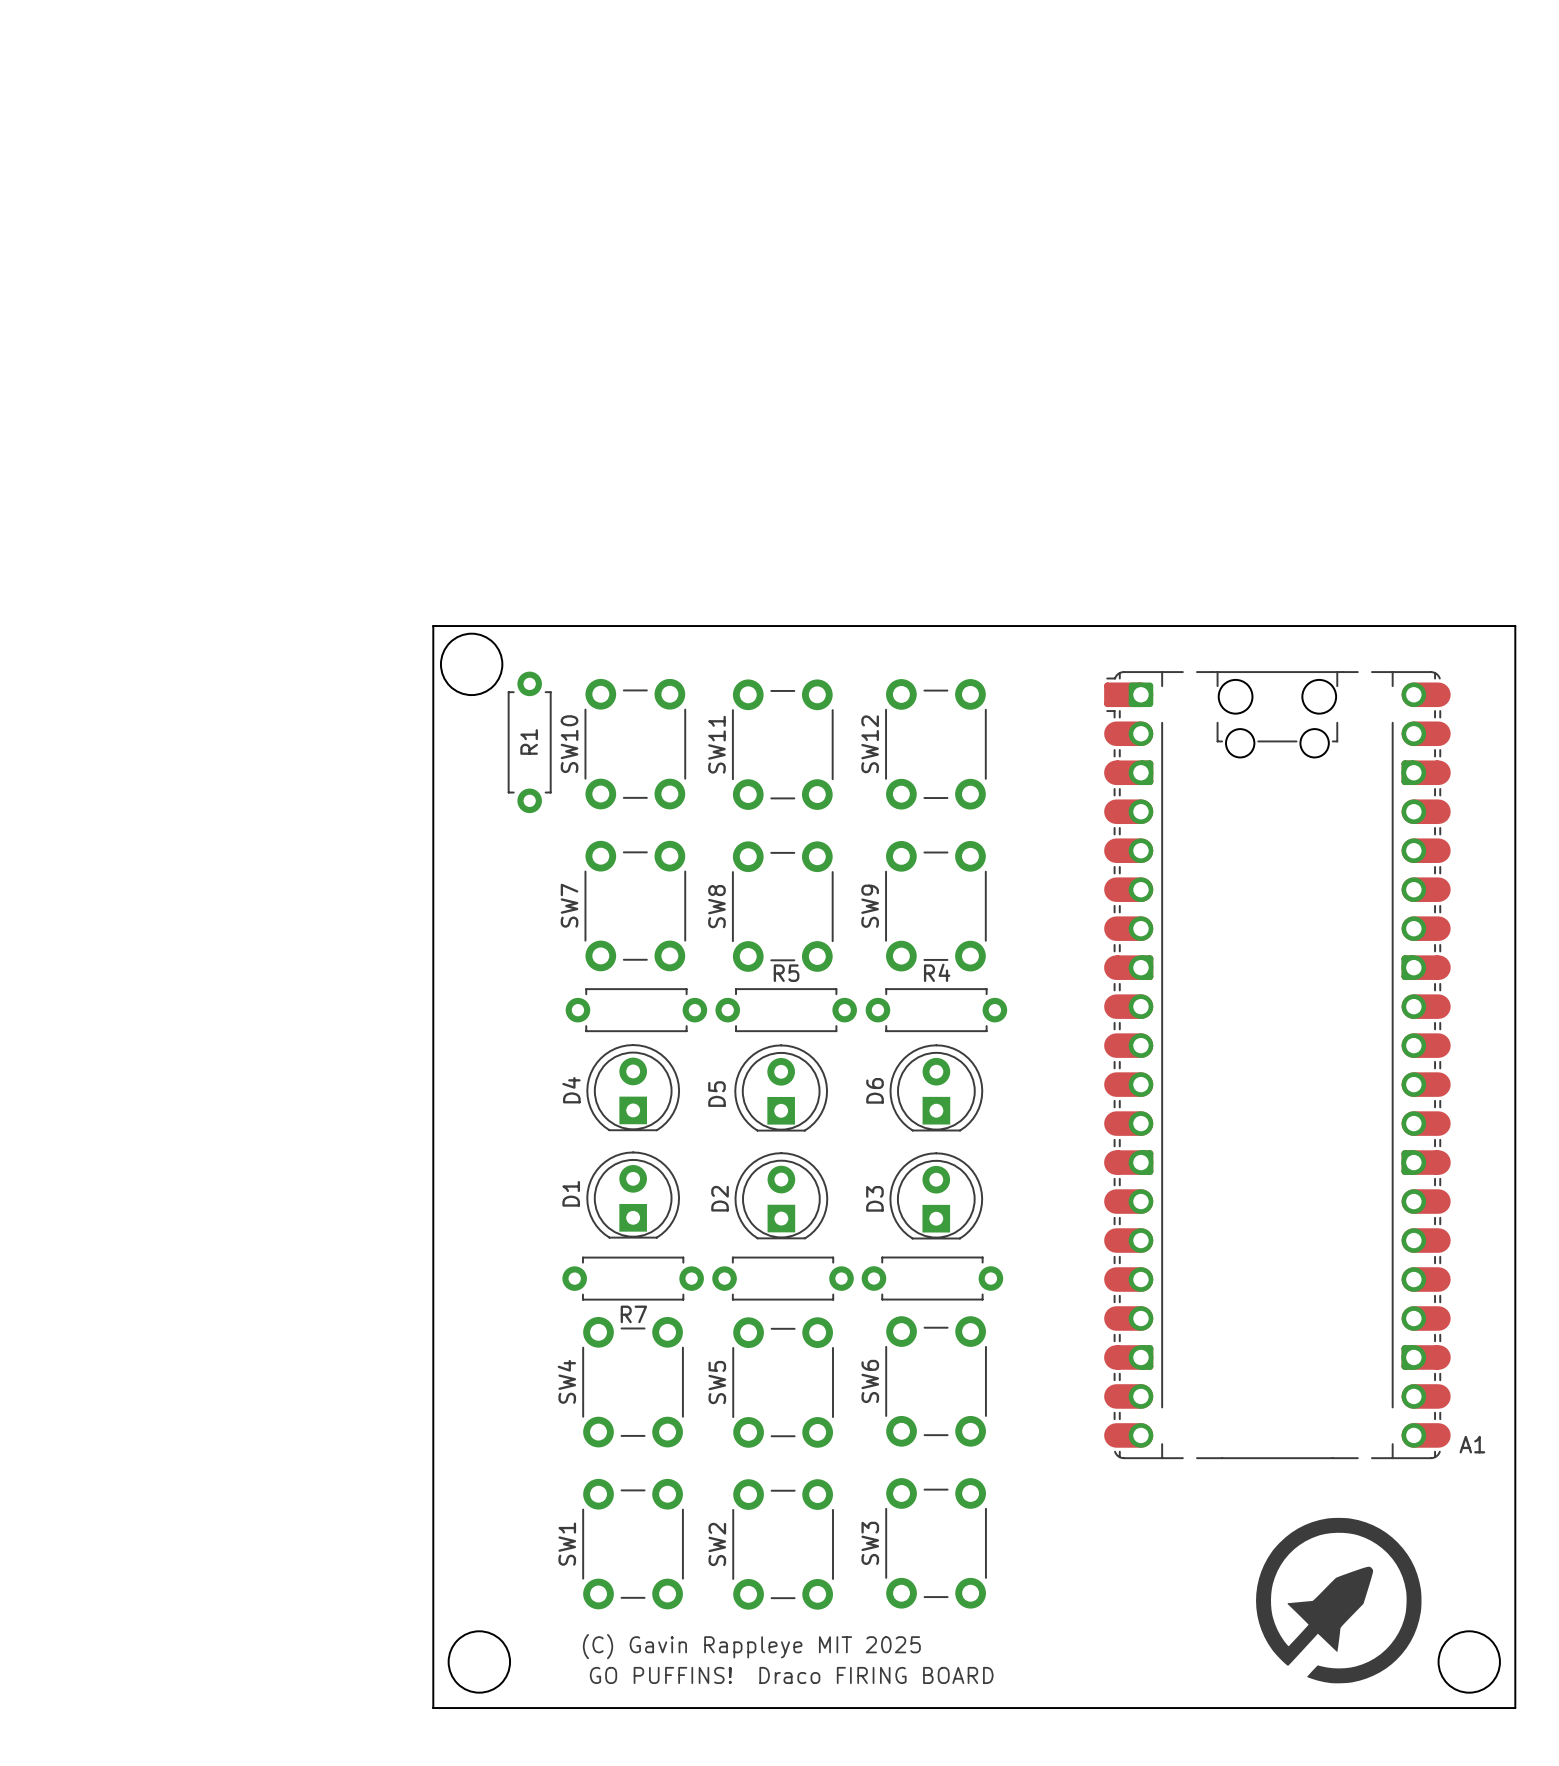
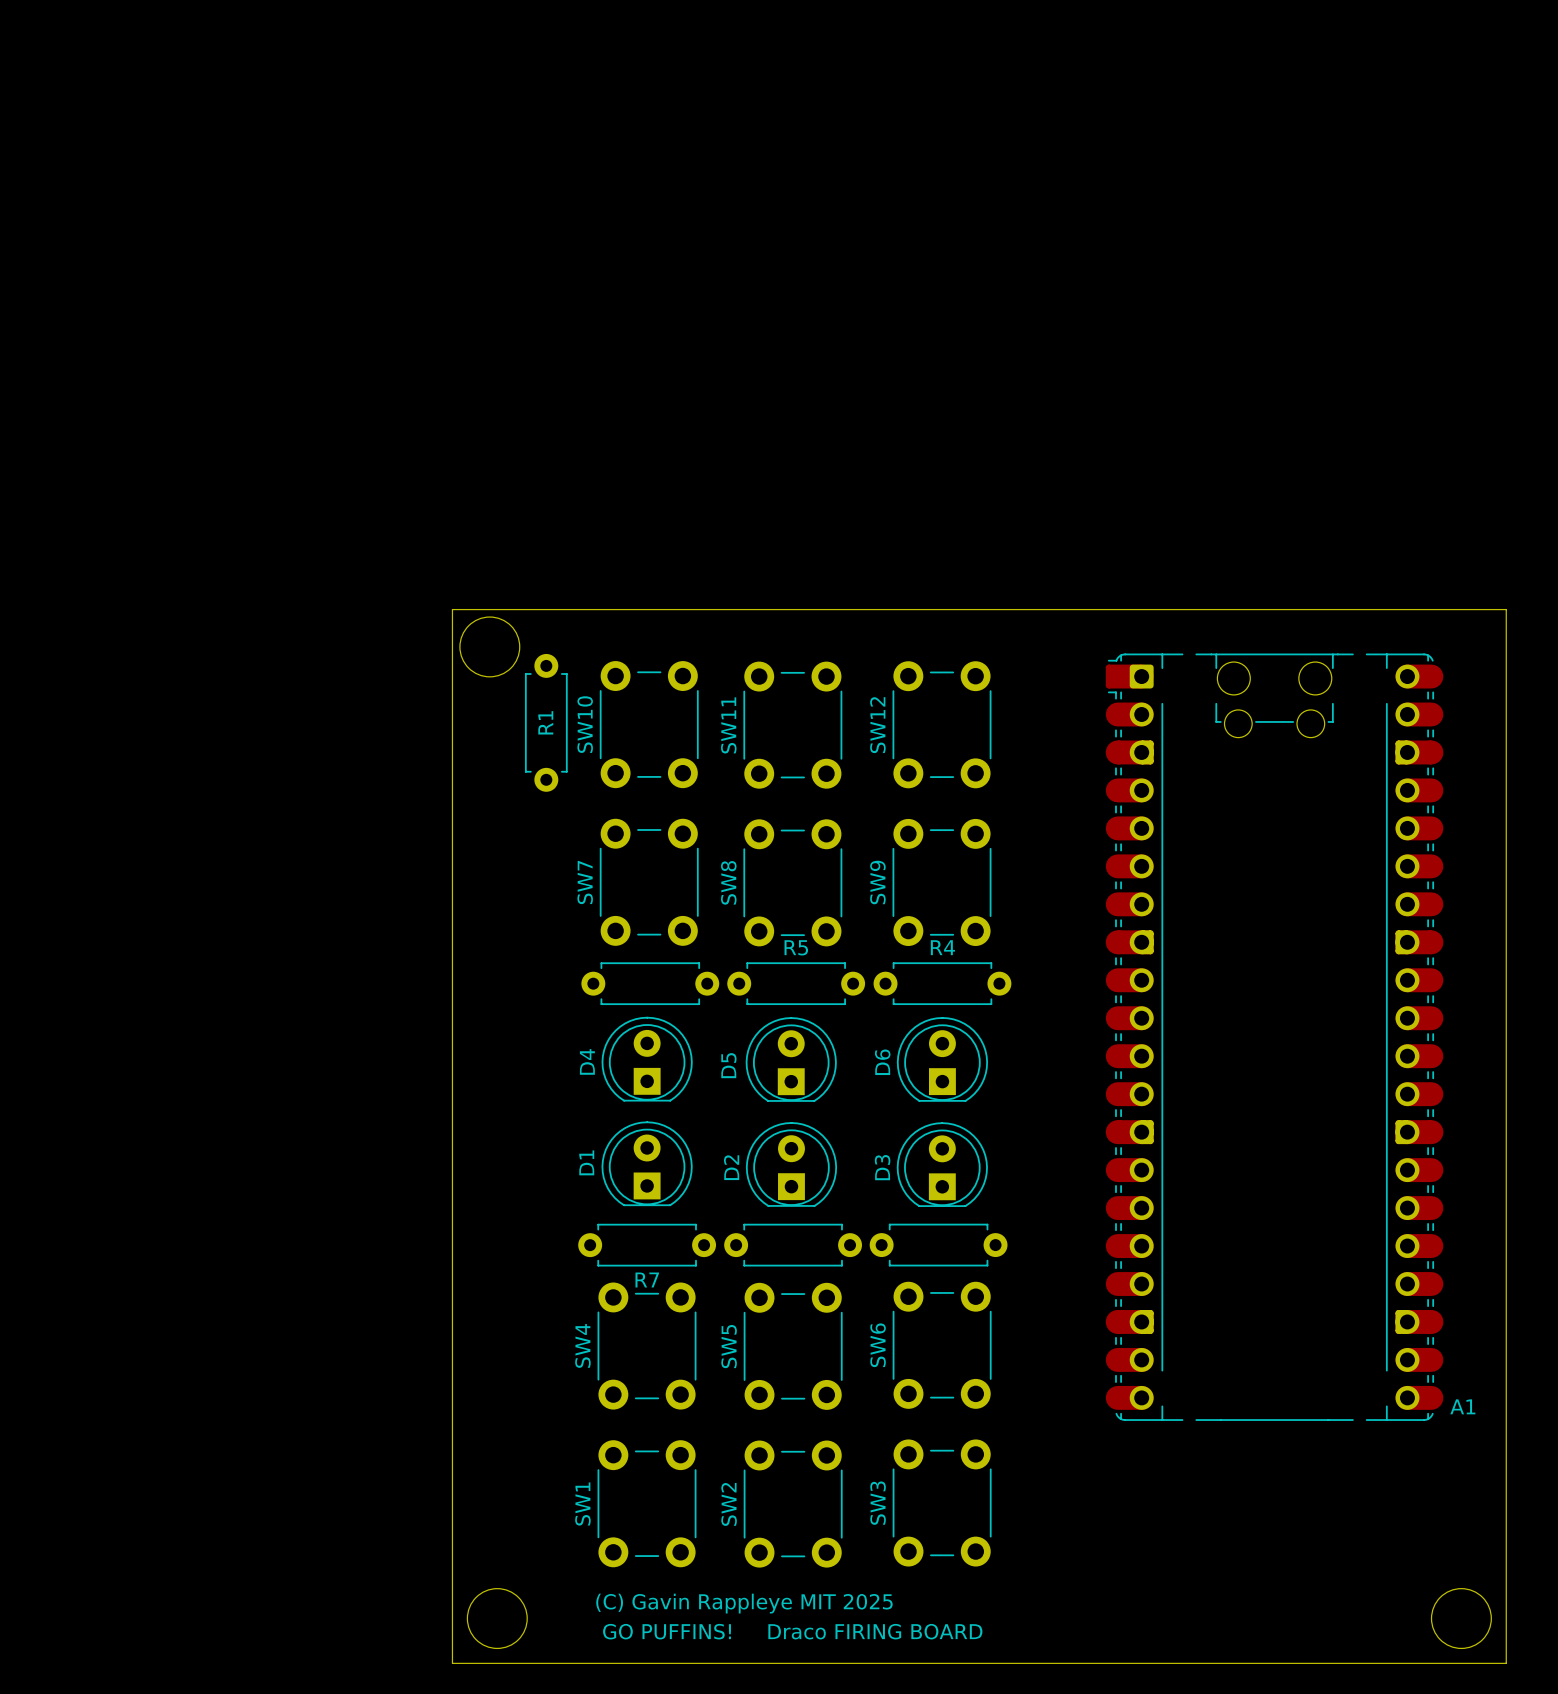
drawing: [1256, 1517, 1422, 1684] -> none

